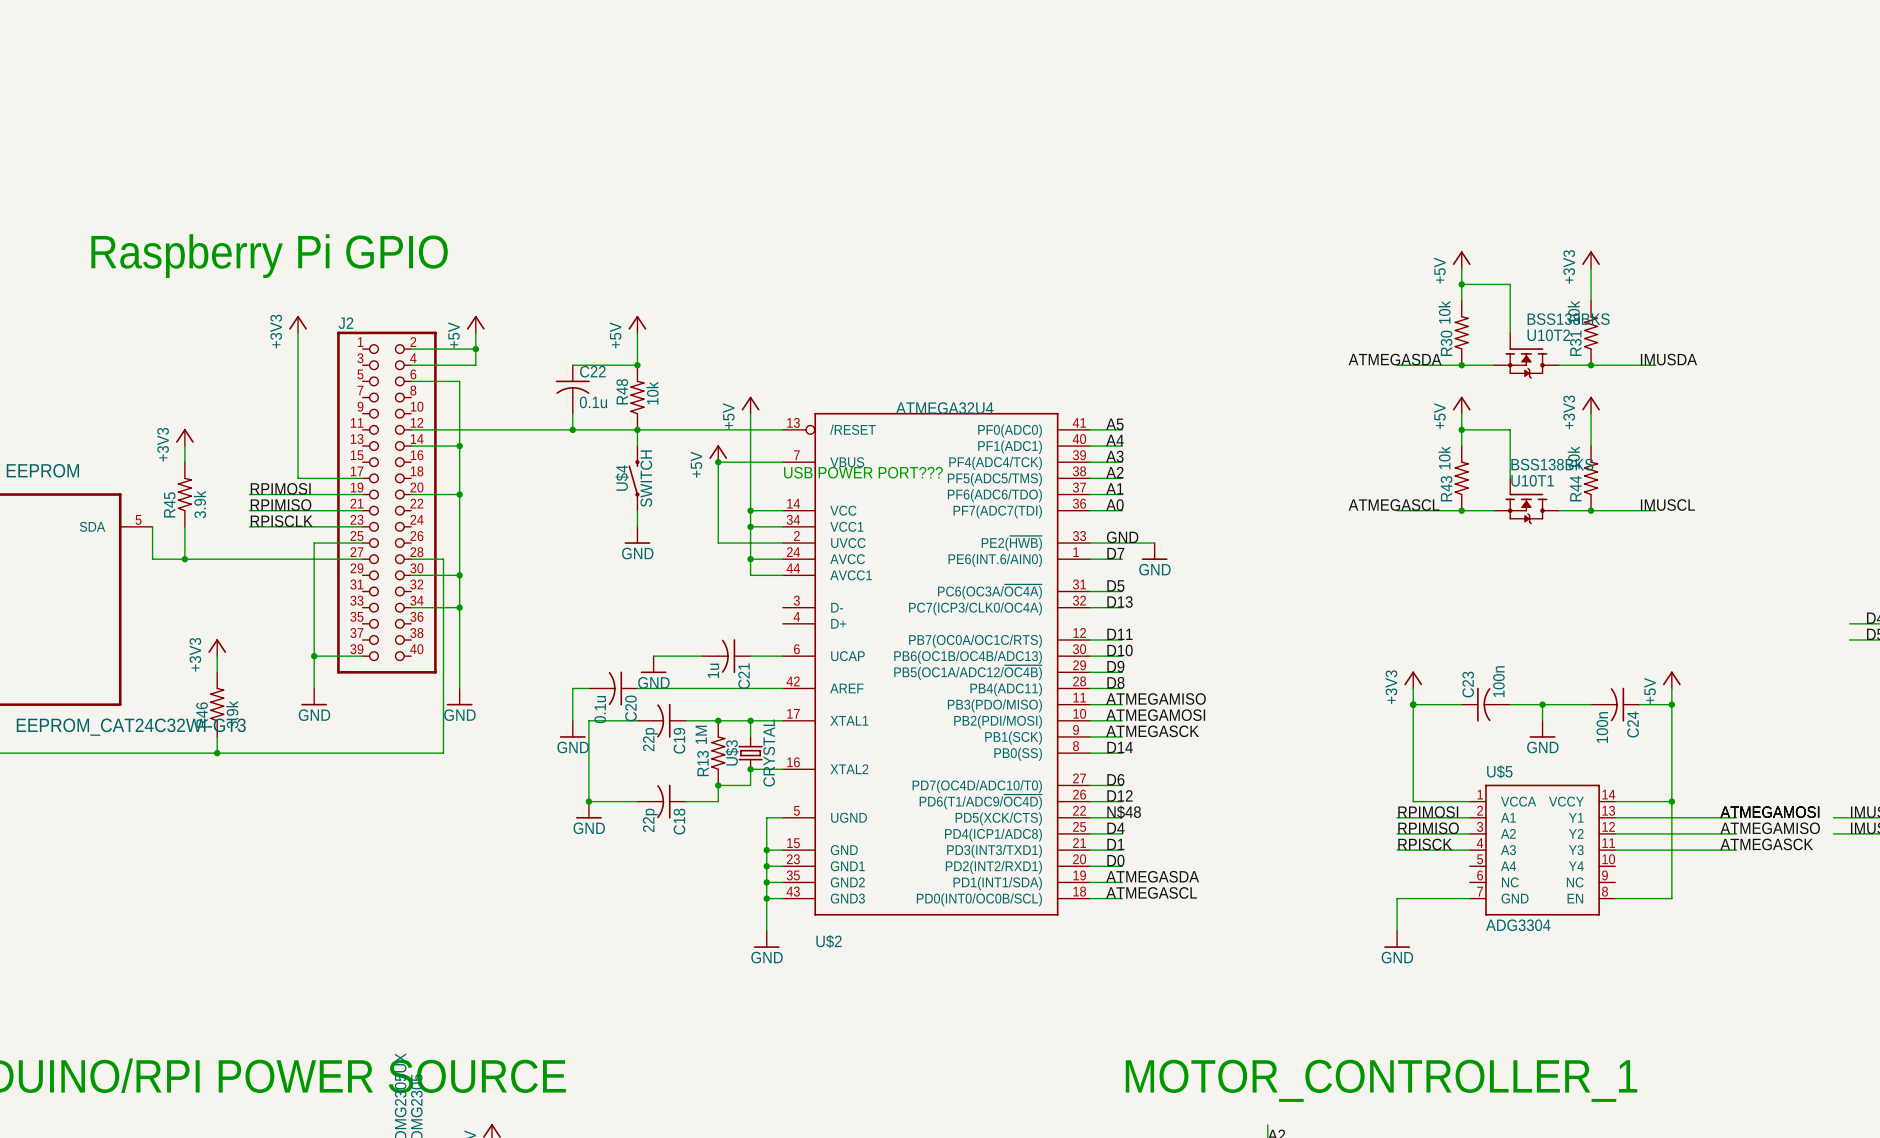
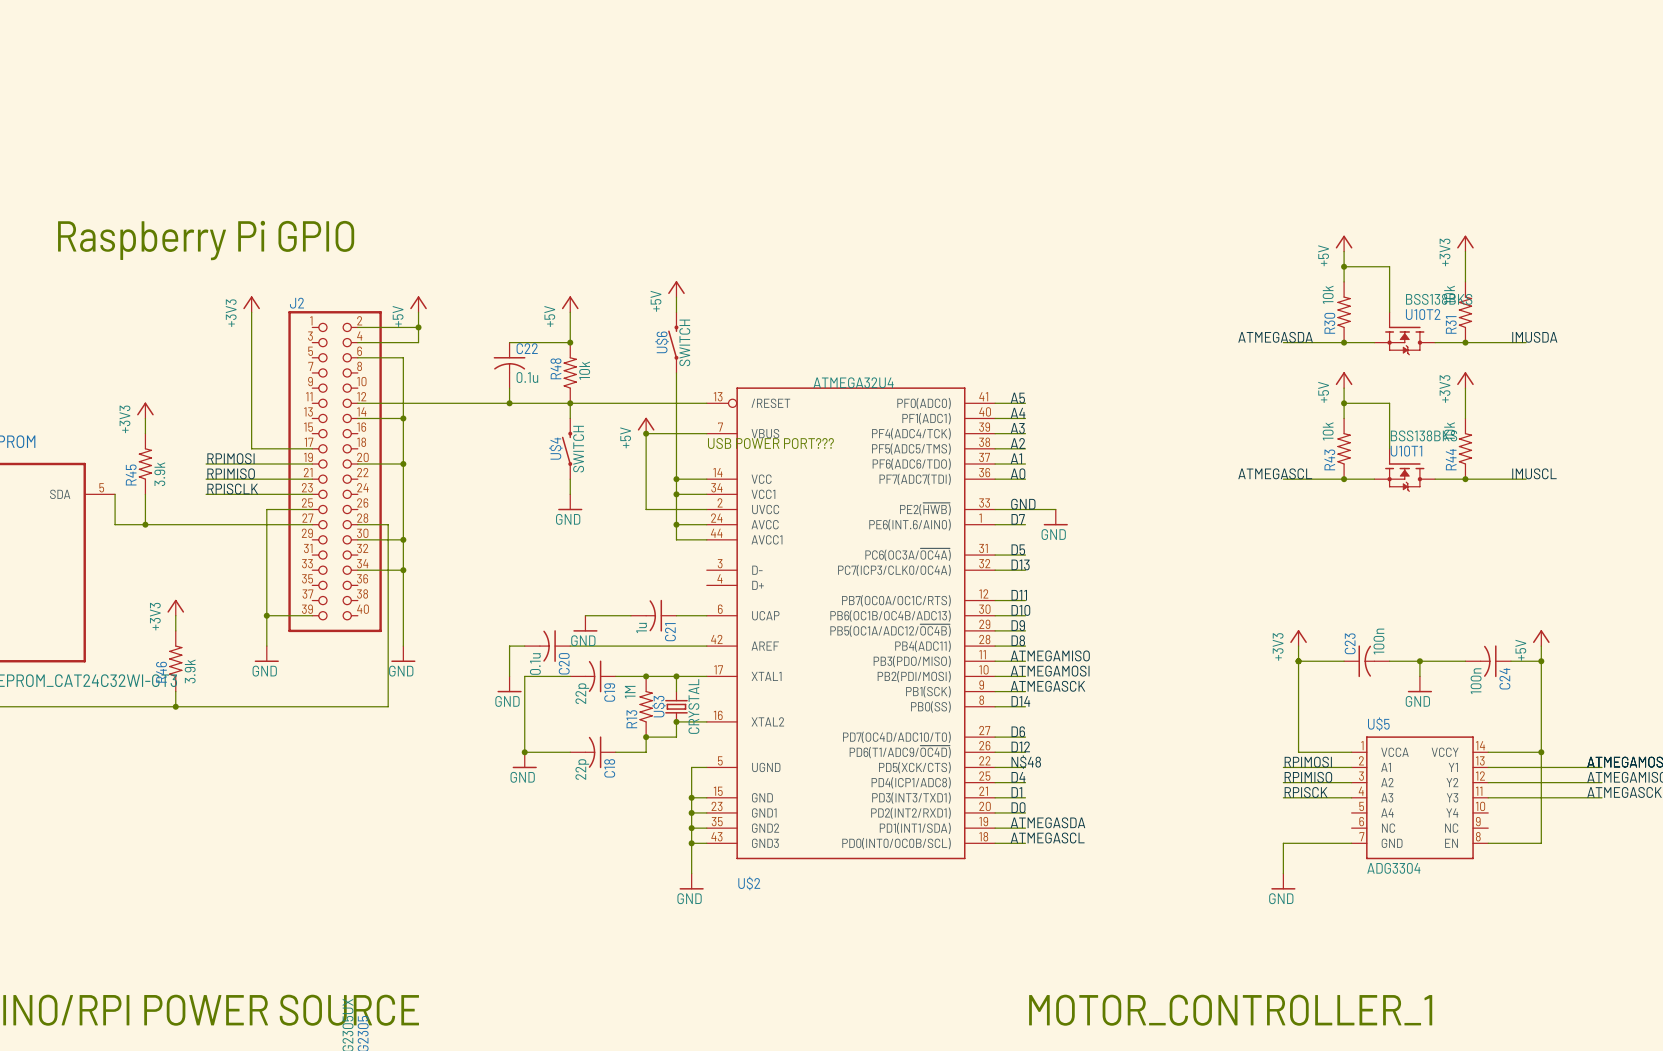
wire: none -> (676, 297) (676, 312)
U$6: none -> SWITCH (673, 342)
power symbol position: +5V (750, 405) -> +5V (676, 289)

